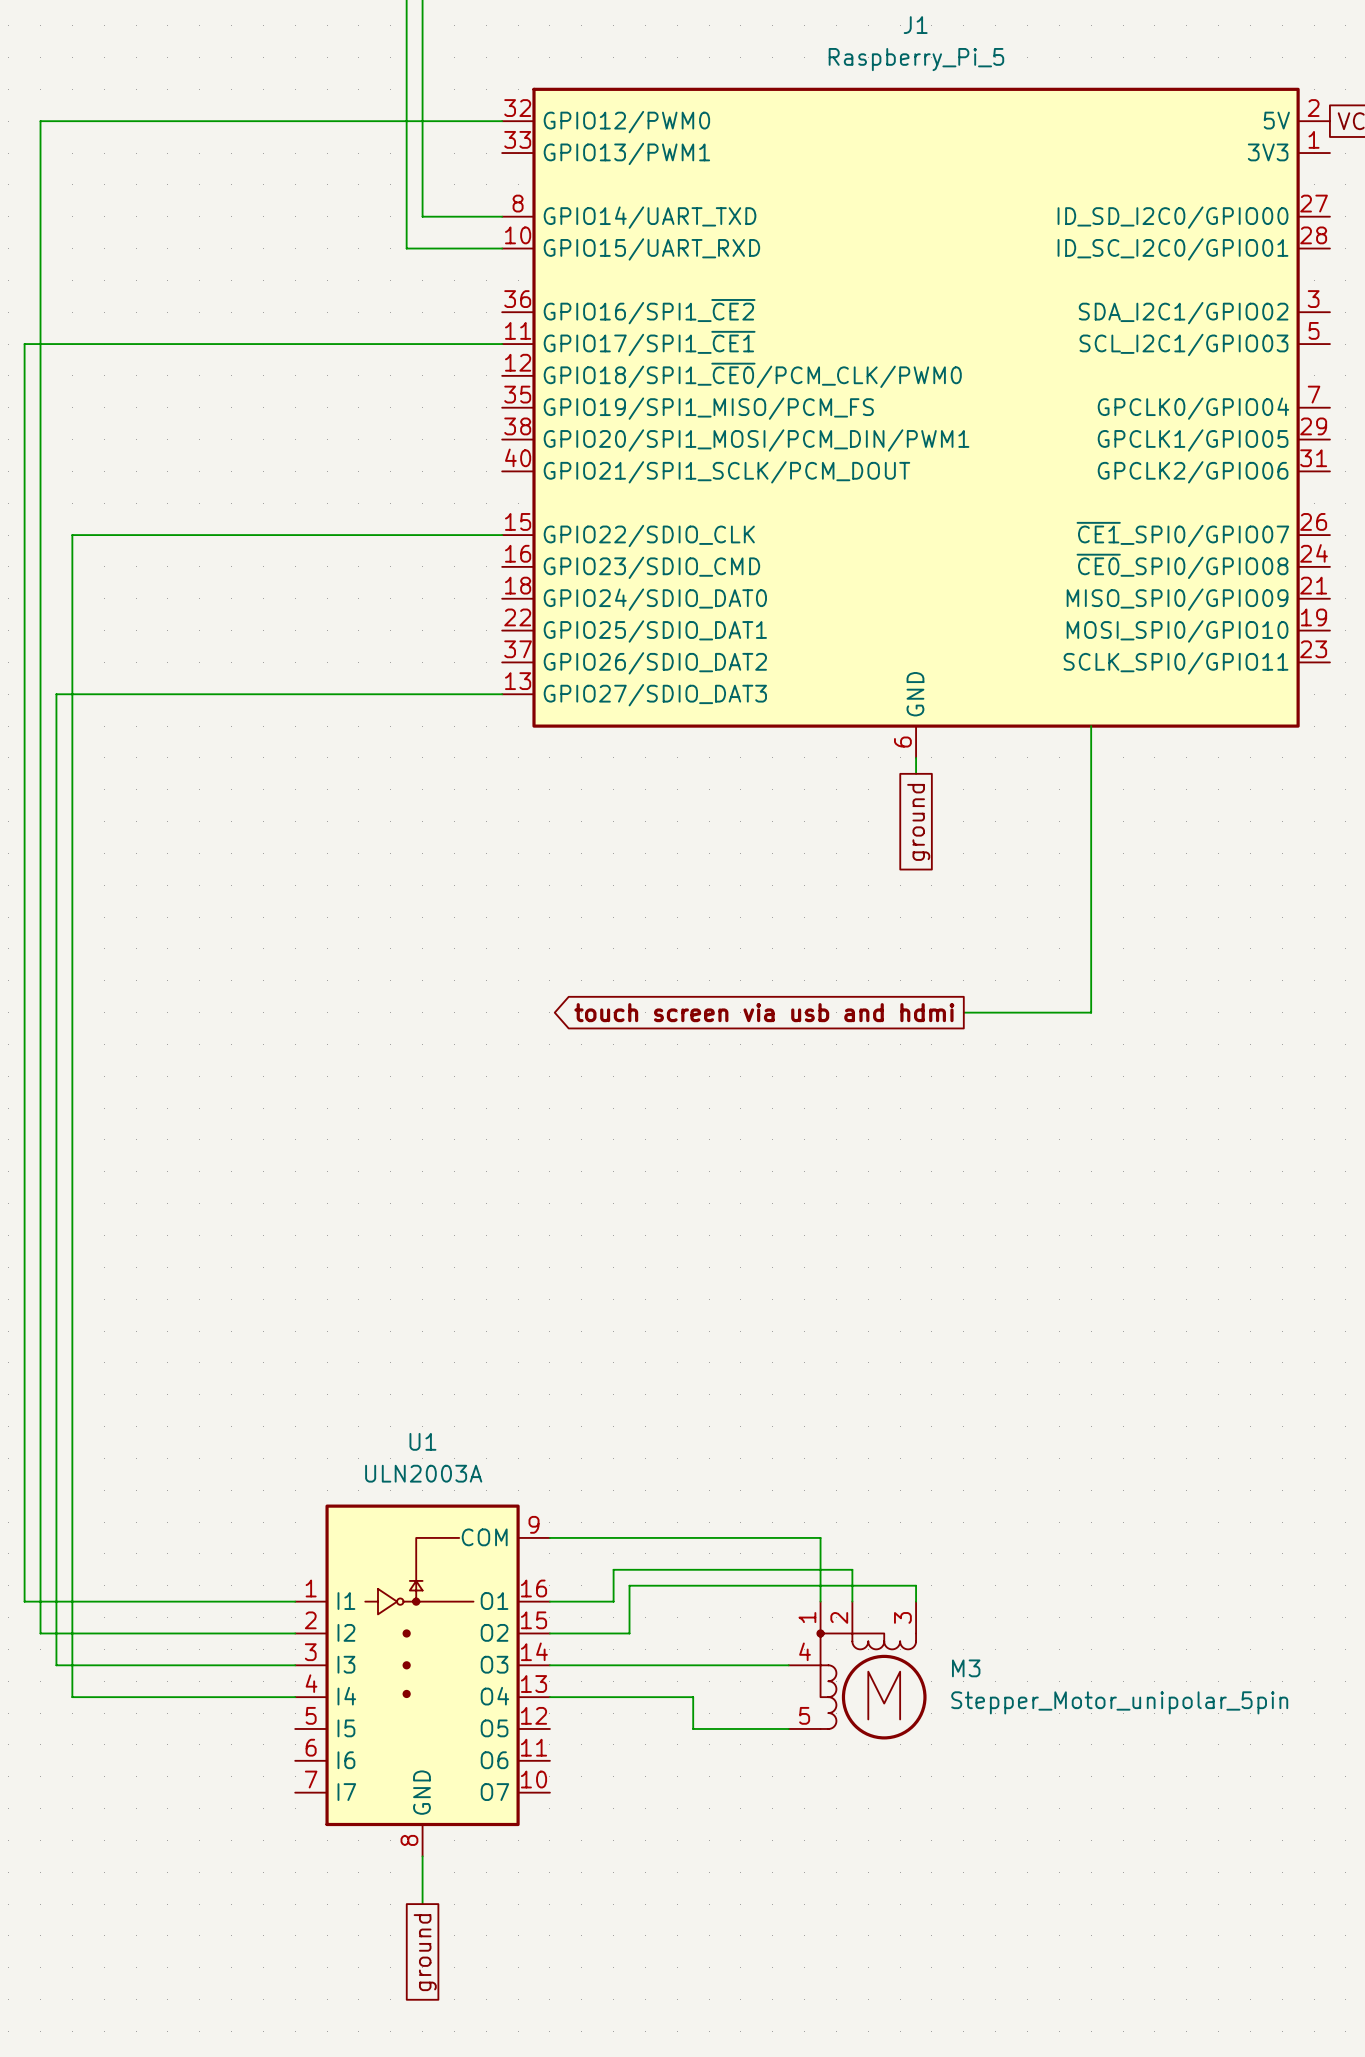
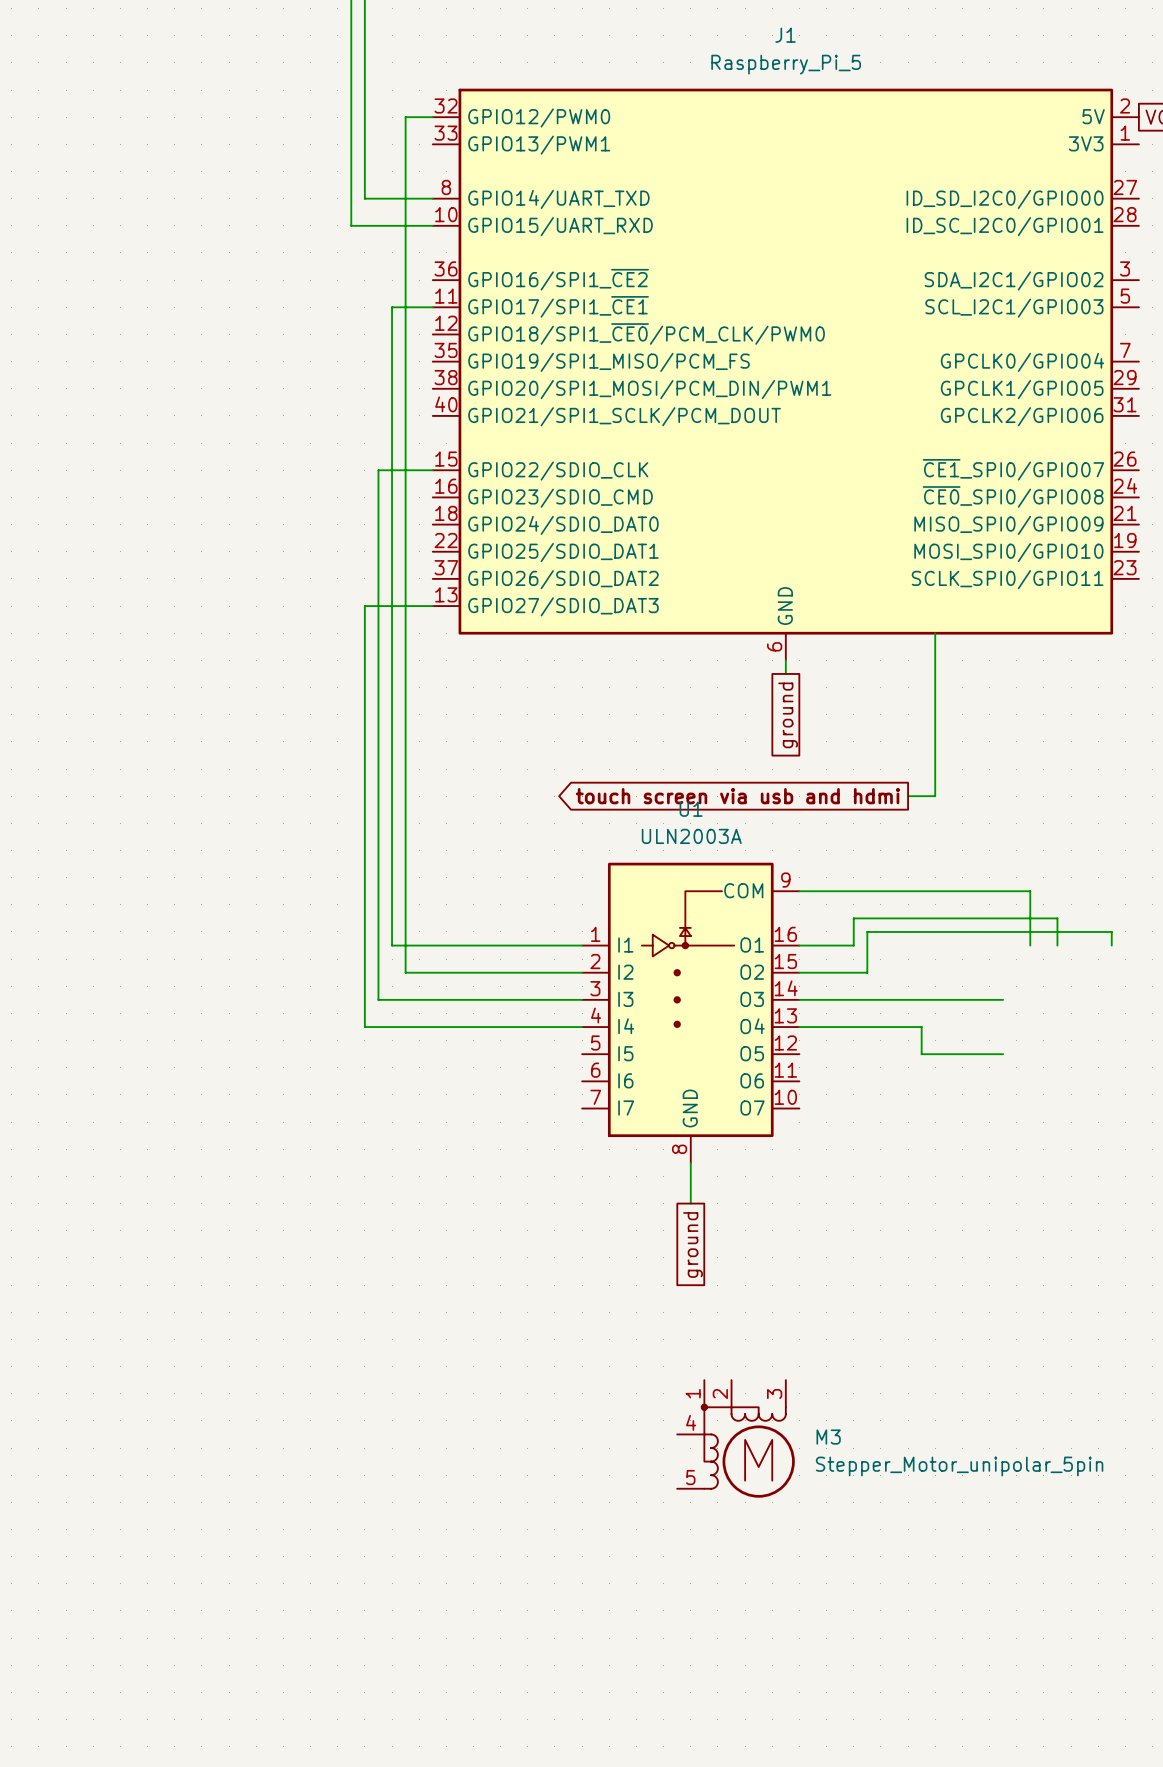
wire: (470, 121) (40, 121) (40, 1633) (295, 1633) -> (405, 117) (405, 972) (582, 972)
wire: (454, 344) (24, 344) (24, 1601) (295, 1601) -> (392, 307) (392, 945) (582, 945)
wire: (438, 535) (72, 535) (72, 1697) (295, 1697) -> (378, 470) (378, 999) (582, 999)
wire: (422, 694) (56, 694) (56, 1665) (295, 1665) -> (364, 606) (364, 1027) (582, 1027)
wire: (1091, 917) (1091, 1012) (963, 1012) -> (935, 796) (908, 796)
global label position: touch screen via usb and hdmi (764, 1012) -> touch screen via usb and hdmi (737, 796)
wire: none -> (799, 891) (1030, 891) (1030, 945)
wire: none -> (799, 945) (853, 945) (853, 918) (1057, 918) (1057, 945)
wire: none -> (1111, 945) (1111, 931) (867, 931) (867, 972) (799, 972)
wire: none -> (799, 999) (1003, 999)
wire: none -> (799, 1027) (921, 1027) (921, 1054) (1003, 1054)
wire: none -> (690, 1162) (690, 1203)
global label: none -> ground (693, 1244)
wire: (549, 1537) (820, 1537) (820, 1601) -> none
wire: (549, 1601) (613, 1601) (613, 1569) (852, 1569) (852, 1601) -> none
wire: (916, 1601) (916, 1585) (629, 1585) (629, 1633) (549, 1633) -> none
wire: (549, 1665) (788, 1665) -> none
U1 position: (422, 1680) -> (690, 1012)
wire: (549, 1697) (693, 1697) (693, 1728) (788, 1728) -> none
wire: (422, 1856) (422, 1904) -> none
global label: ground (425, 1952) -> none

